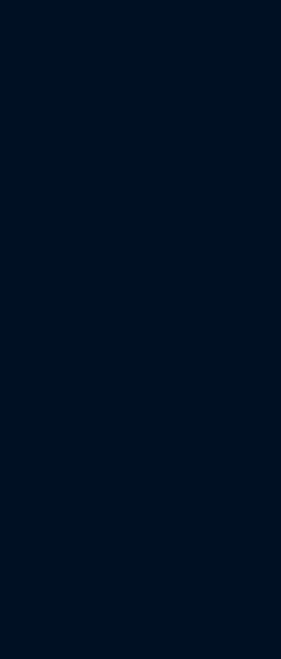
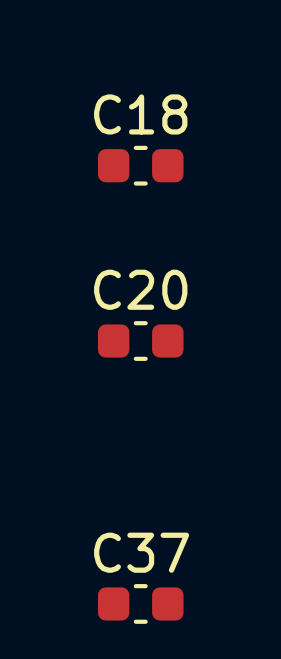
C18: none -> (140, 165)
C20: none -> (140, 341)
C37: none -> (140, 603)

